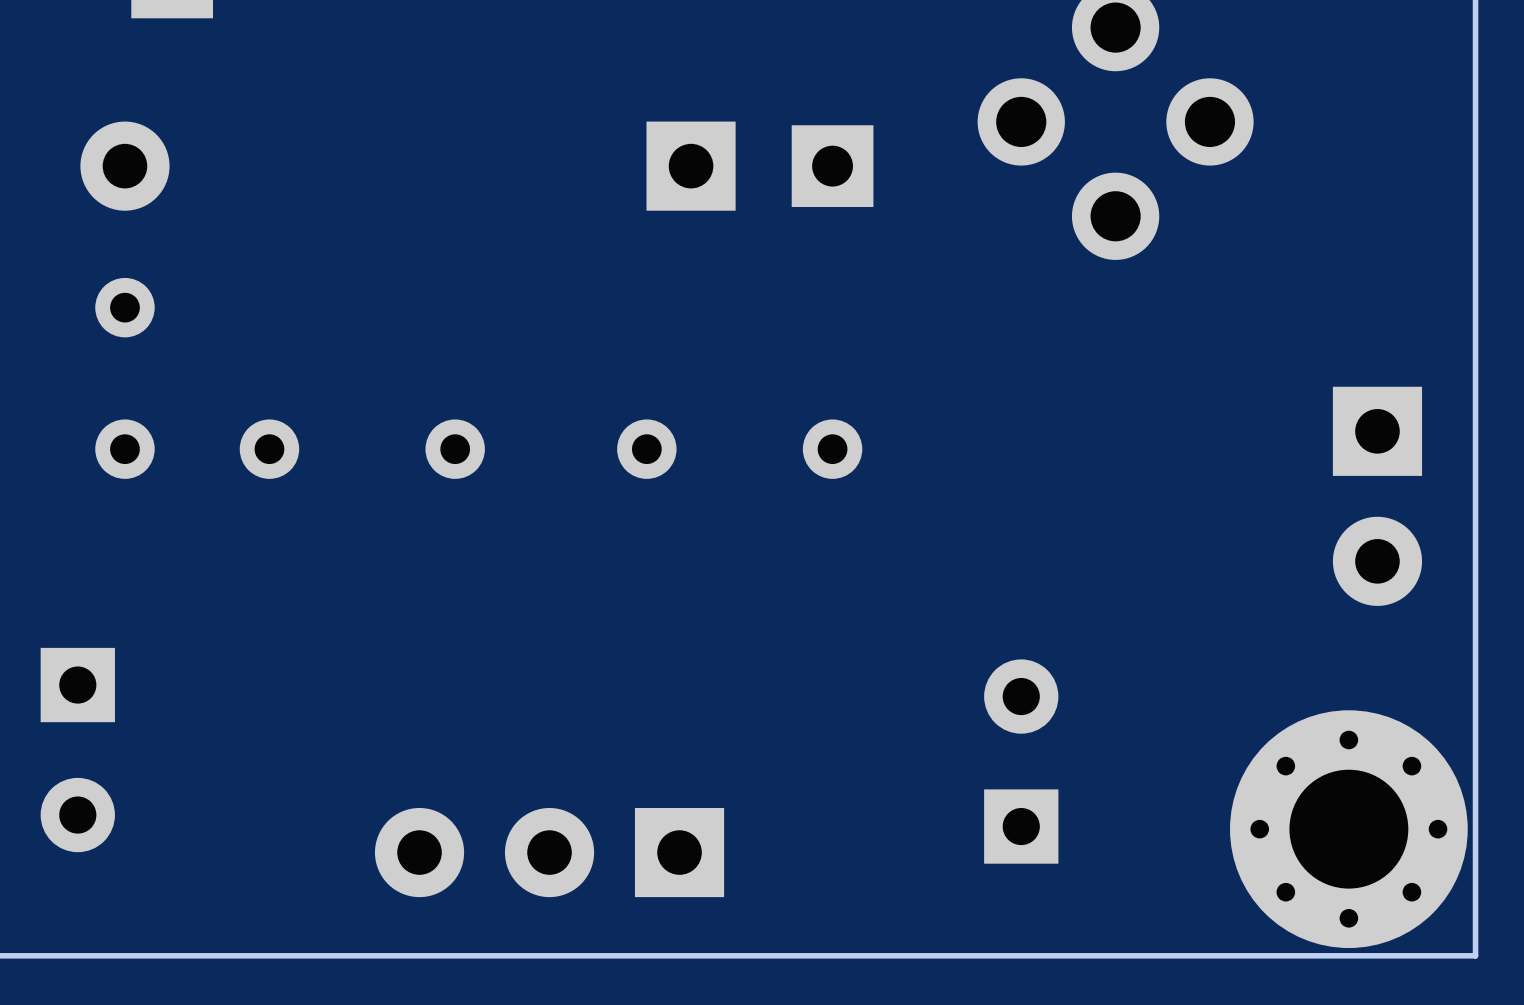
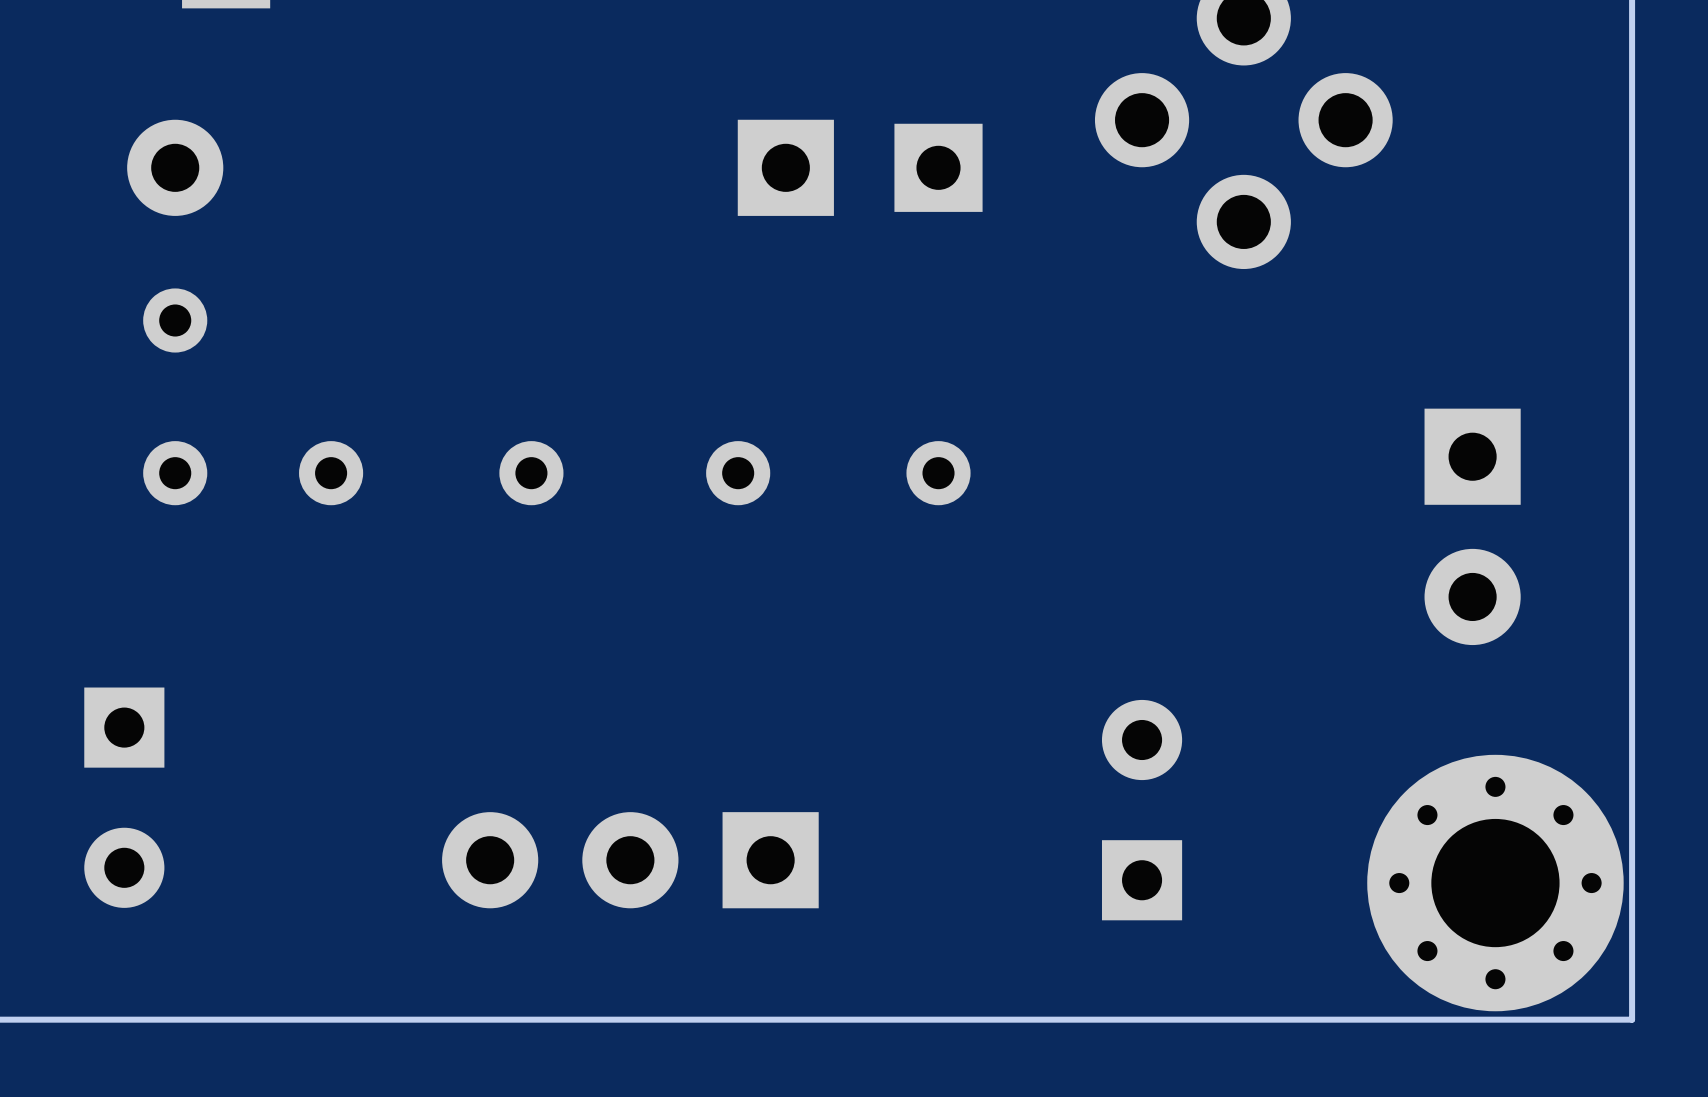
part position: (1377, 496) -> (1472, 526)
part position: (549, 852) -> (630, 860)

